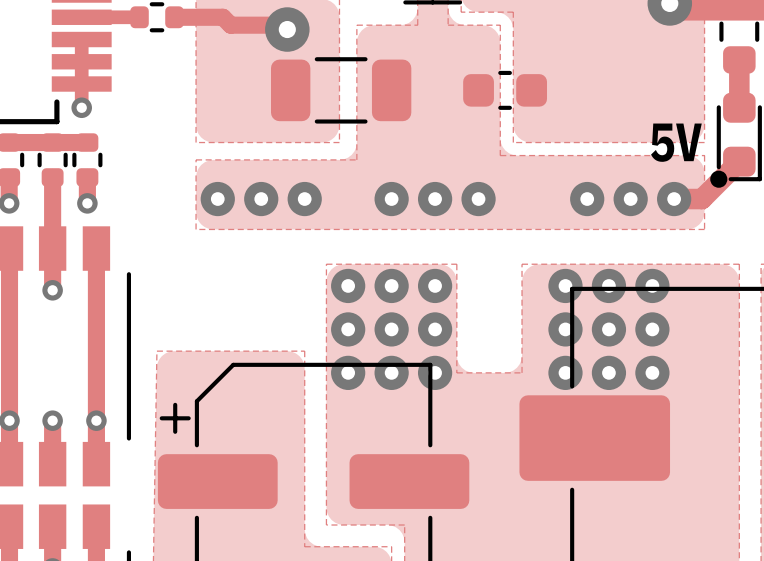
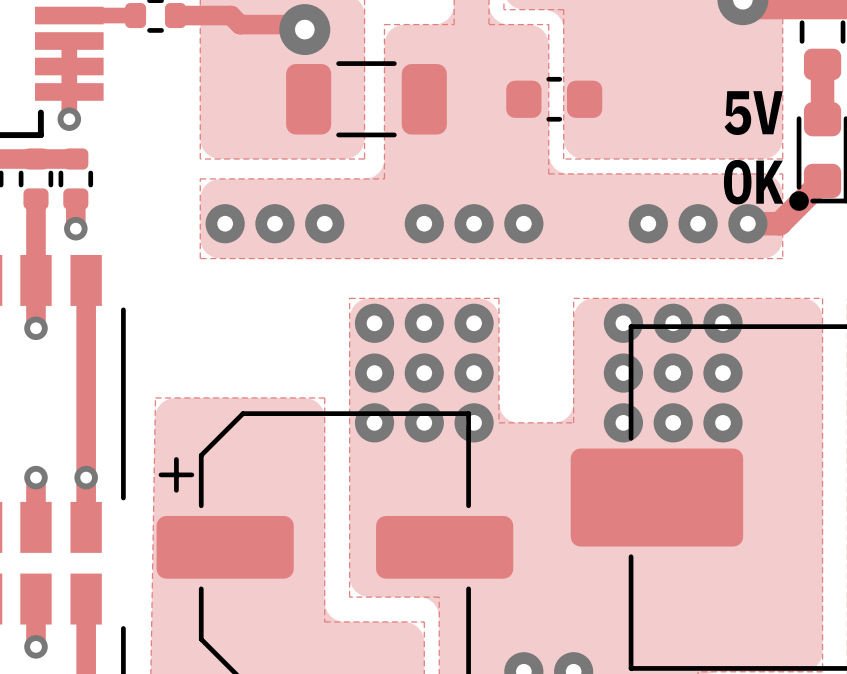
text position: 5V (676, 142) -> 5V (753, 113)
text: none -> OK (753, 182)

